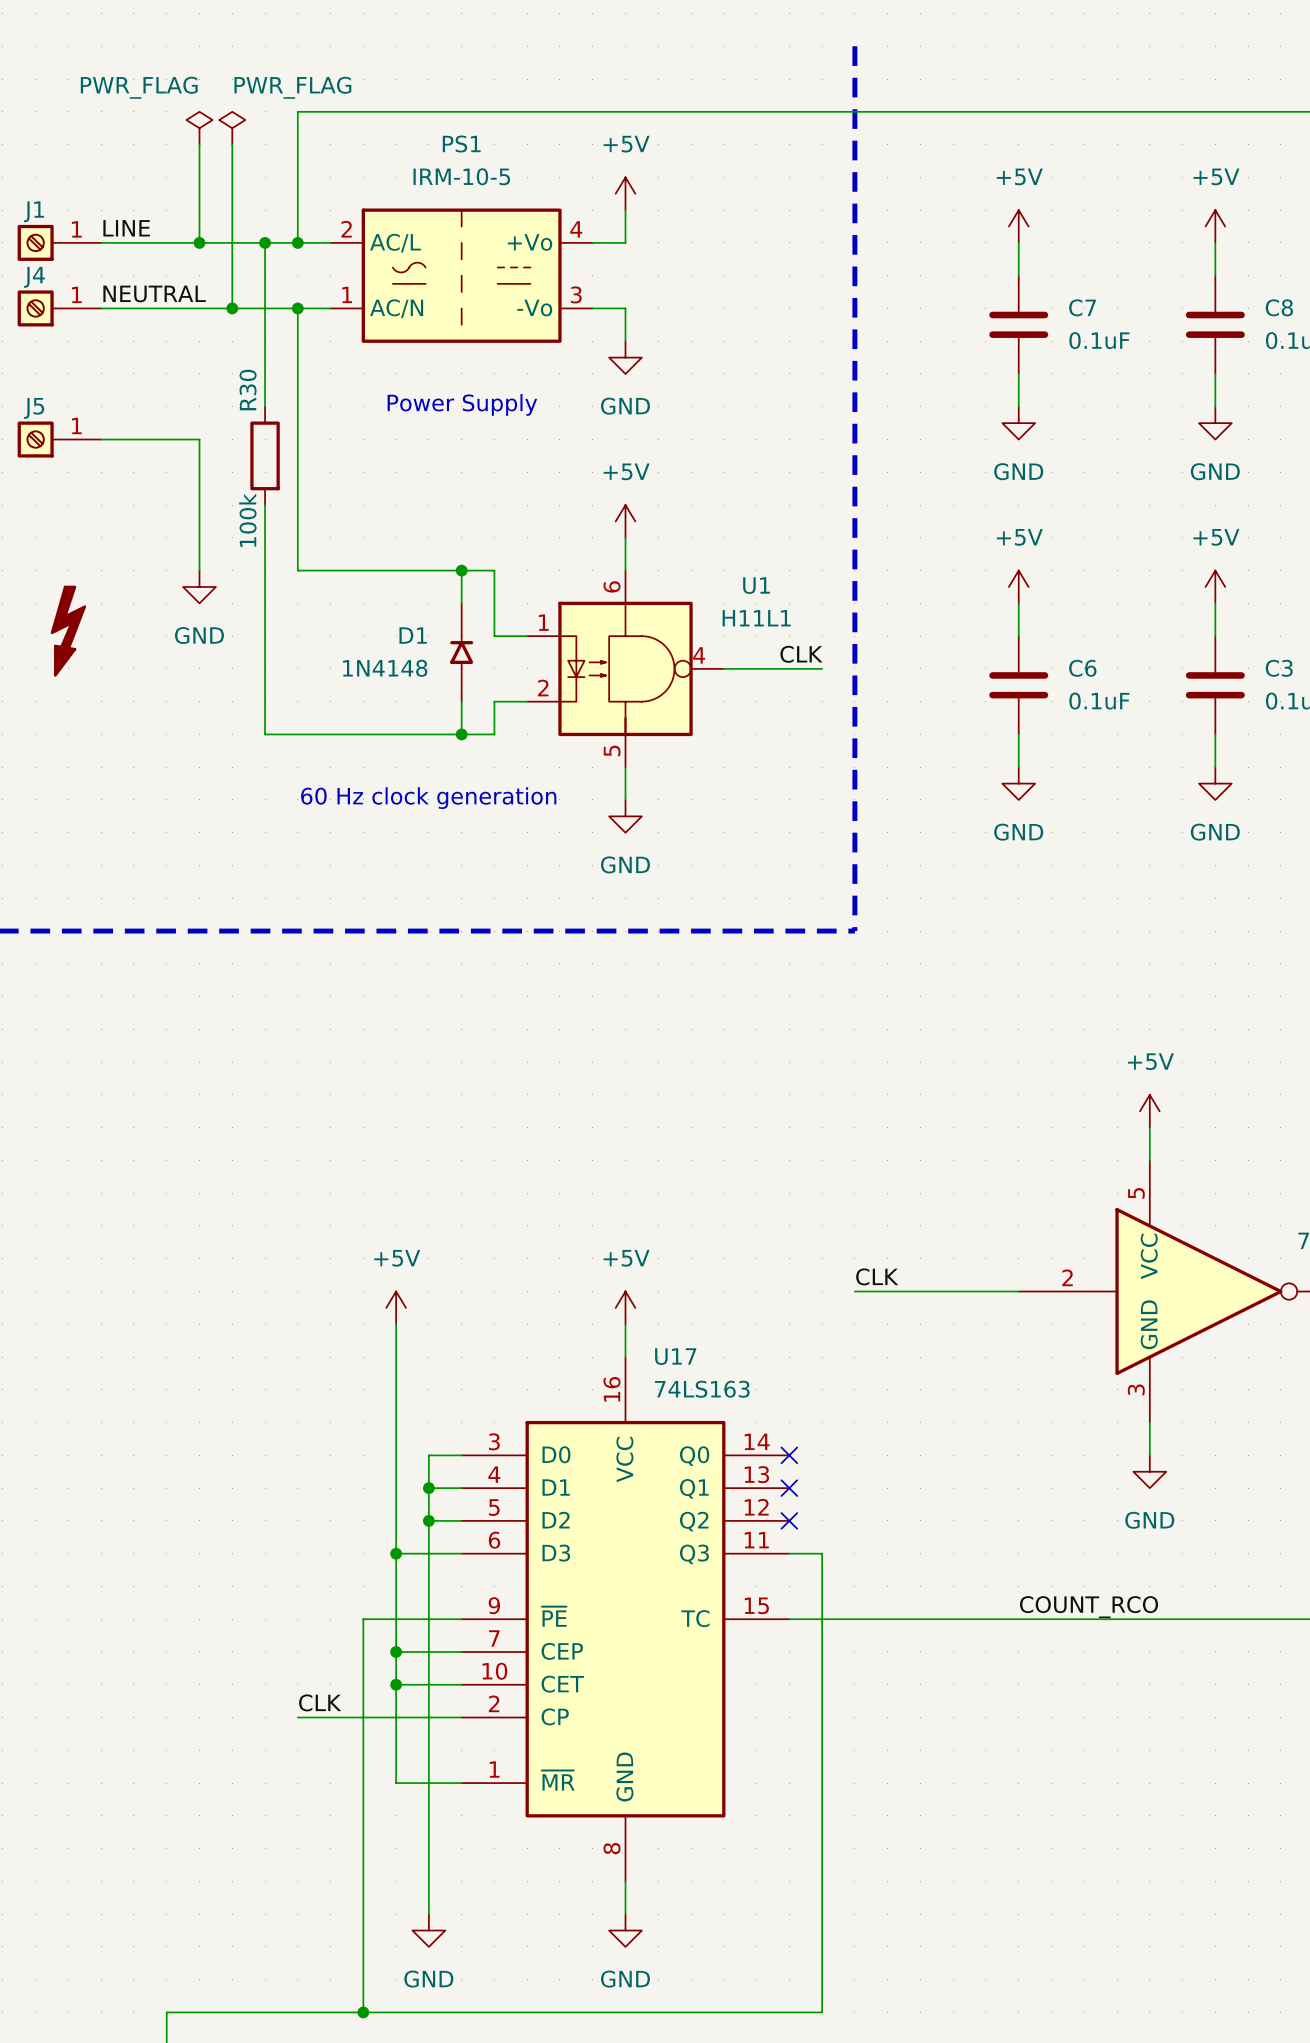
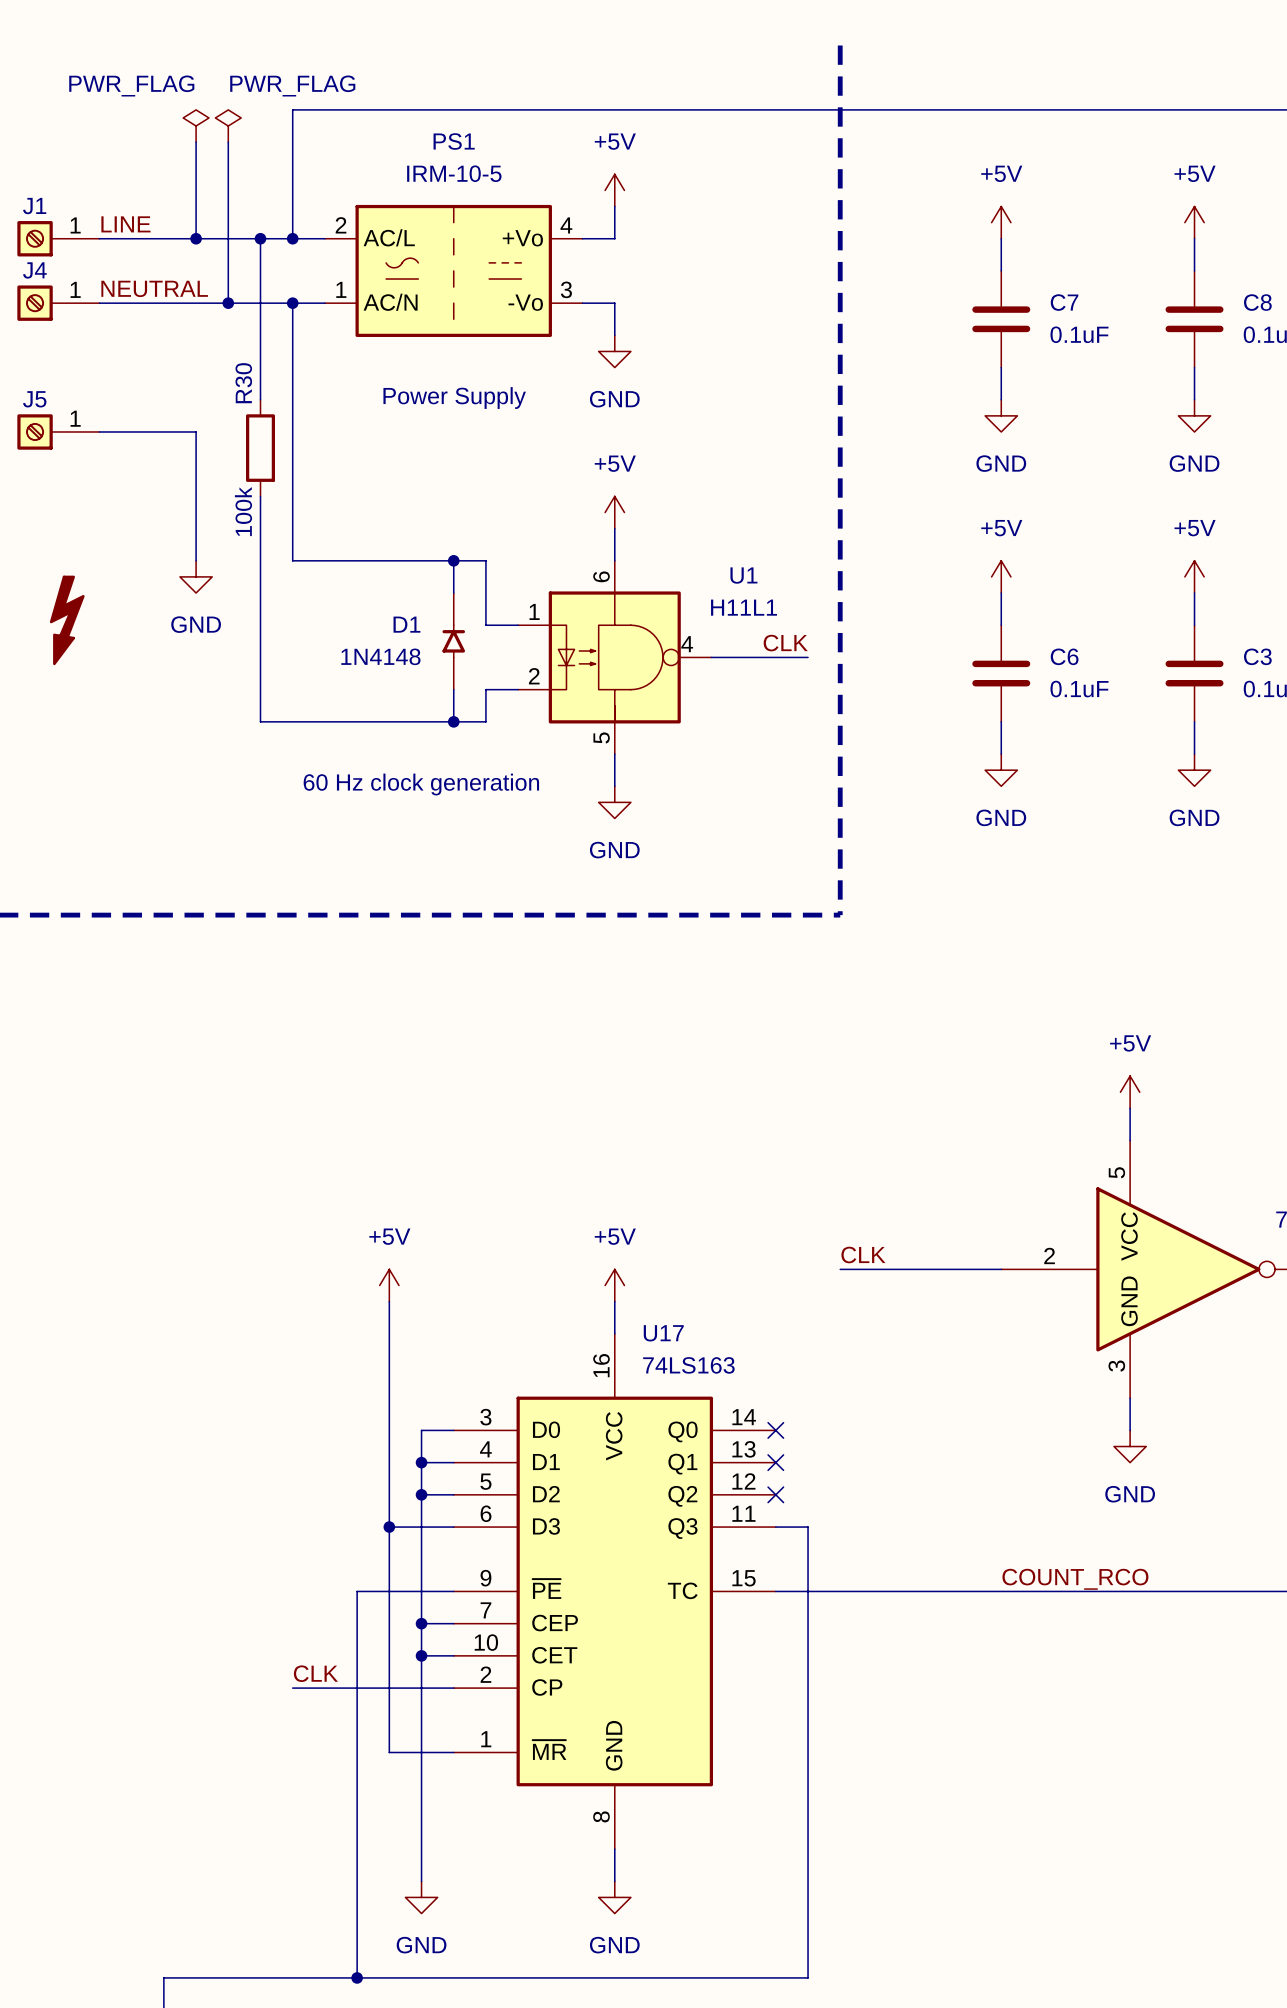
wire: (396, 1651) (428, 1651) -> none
junction: (396, 1651) -> none
junction: none -> (421, 1623)
wire: (396, 1684) (428, 1684) -> none
junction: (396, 1684) -> none
junction: none -> (421, 1655)

